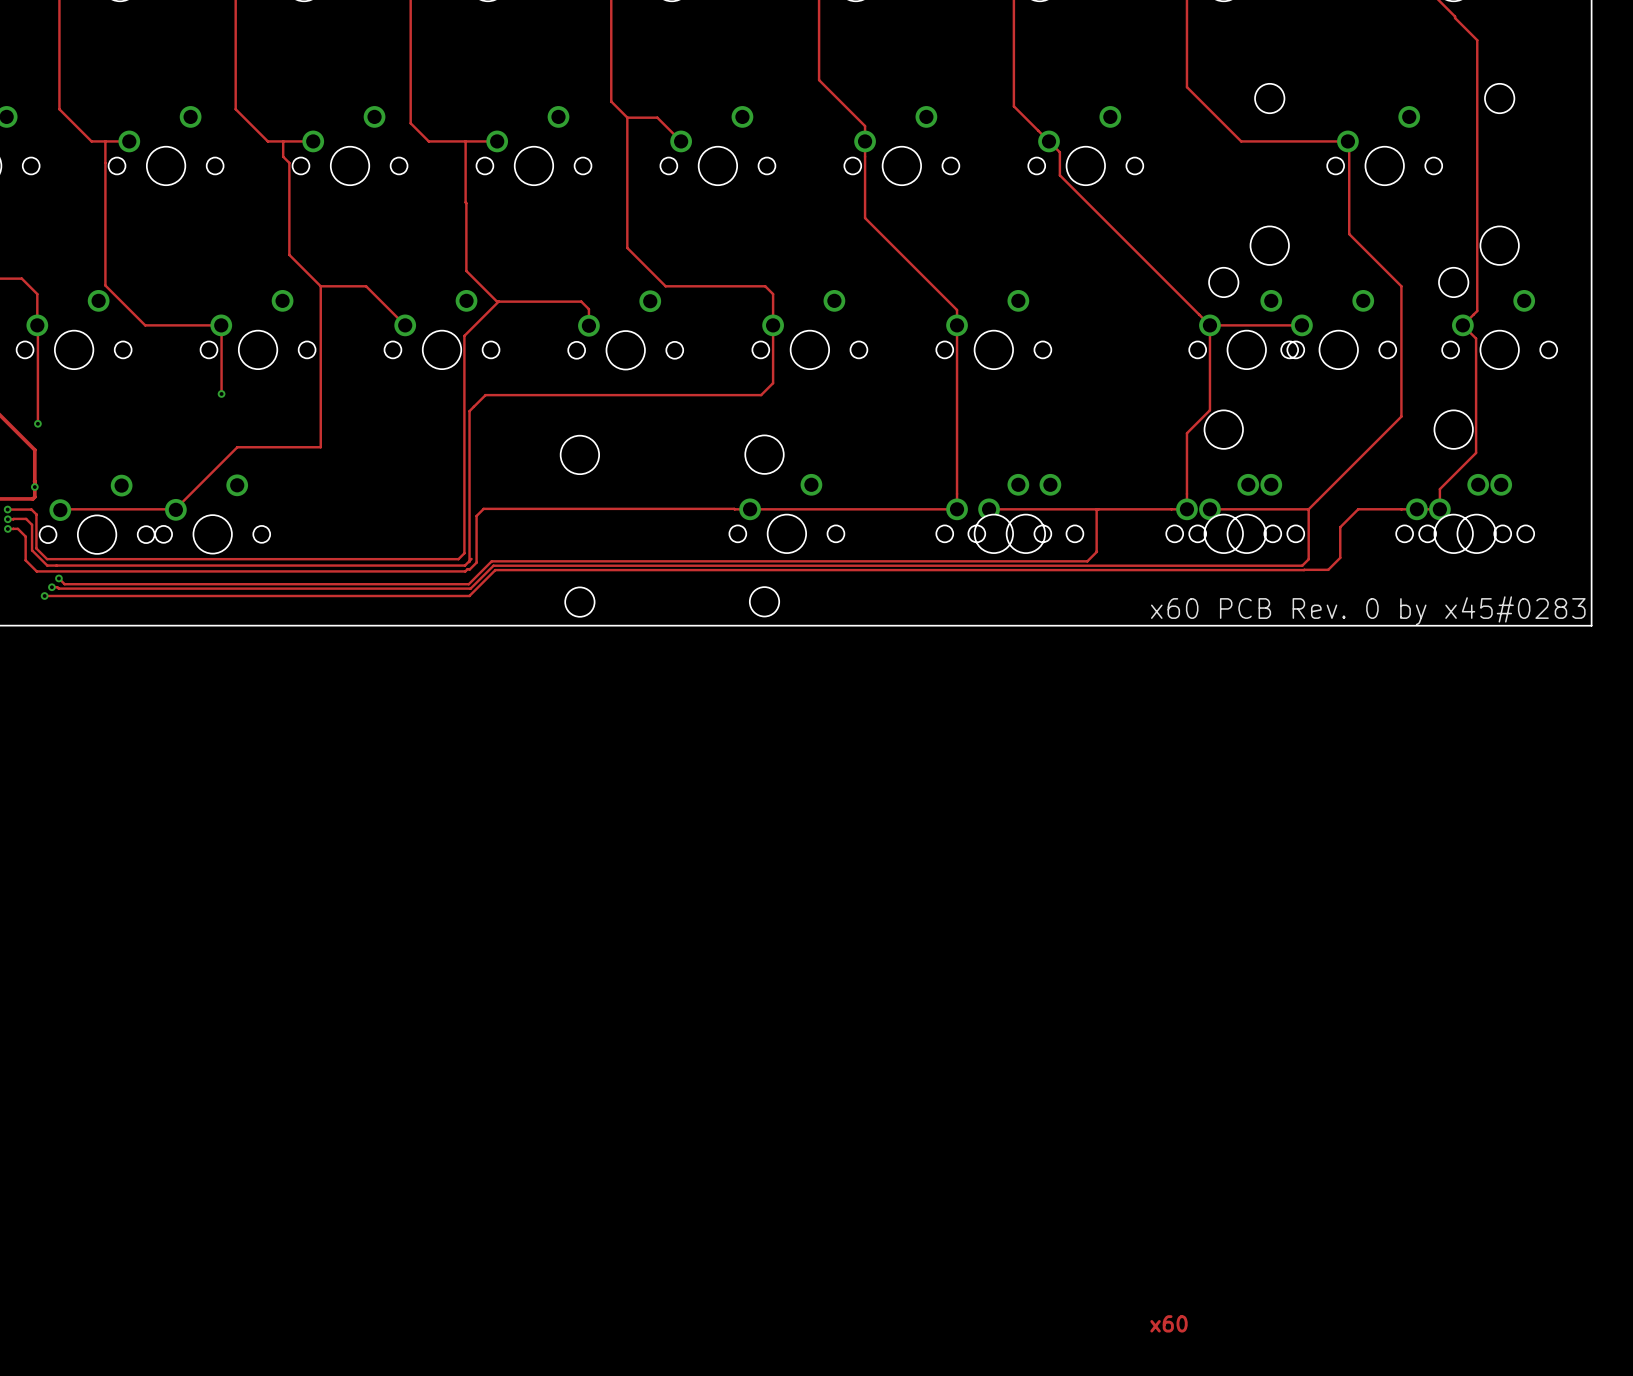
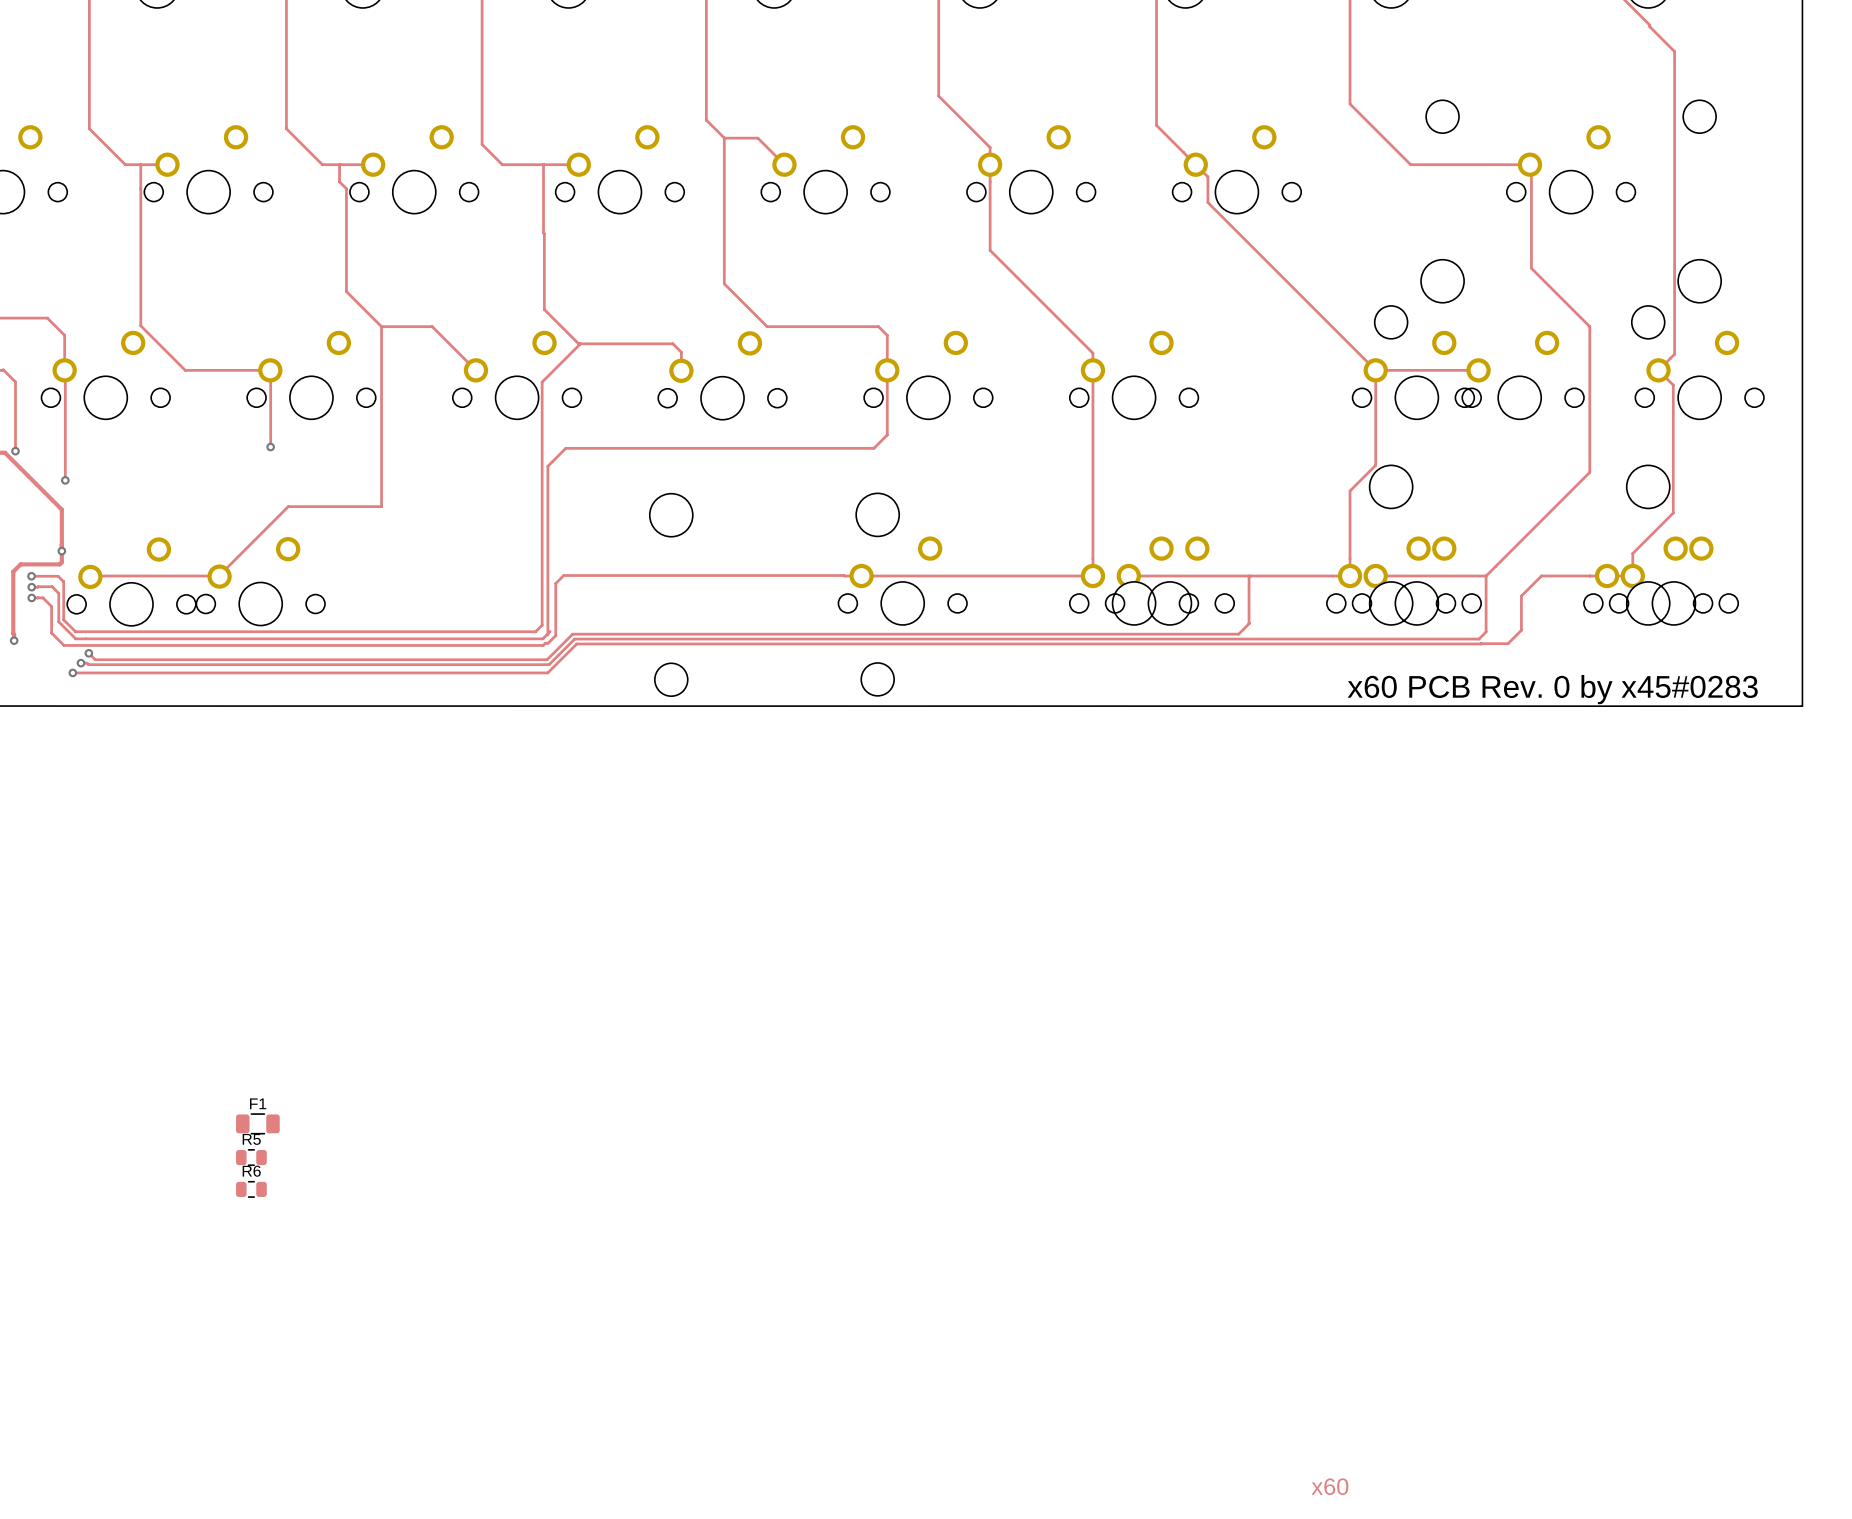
F1: none -> (257, 1123)
R5: none -> (251, 1157)
R6: none -> (251, 1189)

